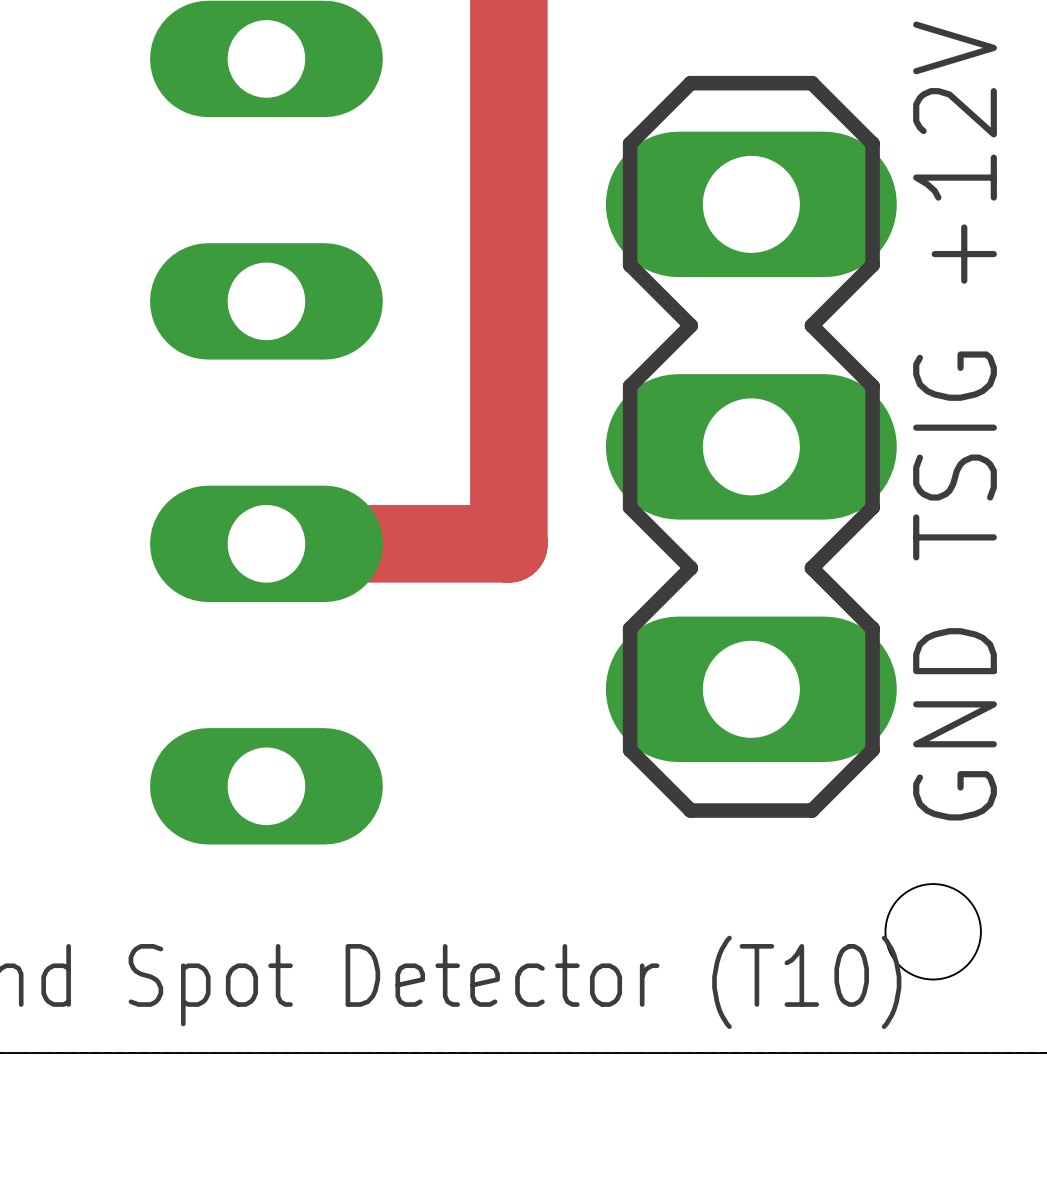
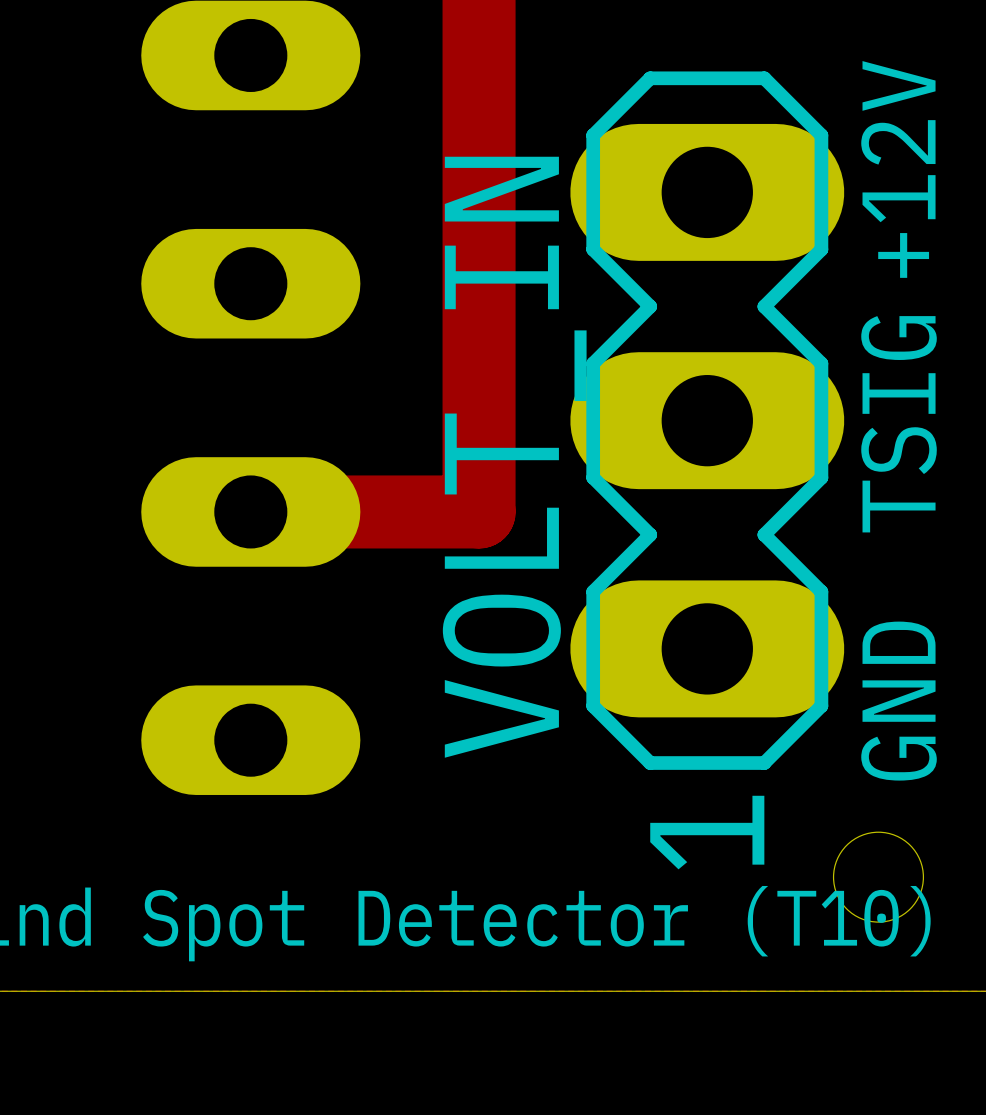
VOLT_IN name: none -> VOLT_IN (514, 457)
VOLT_IN text: none -> 1 (707, 832)

